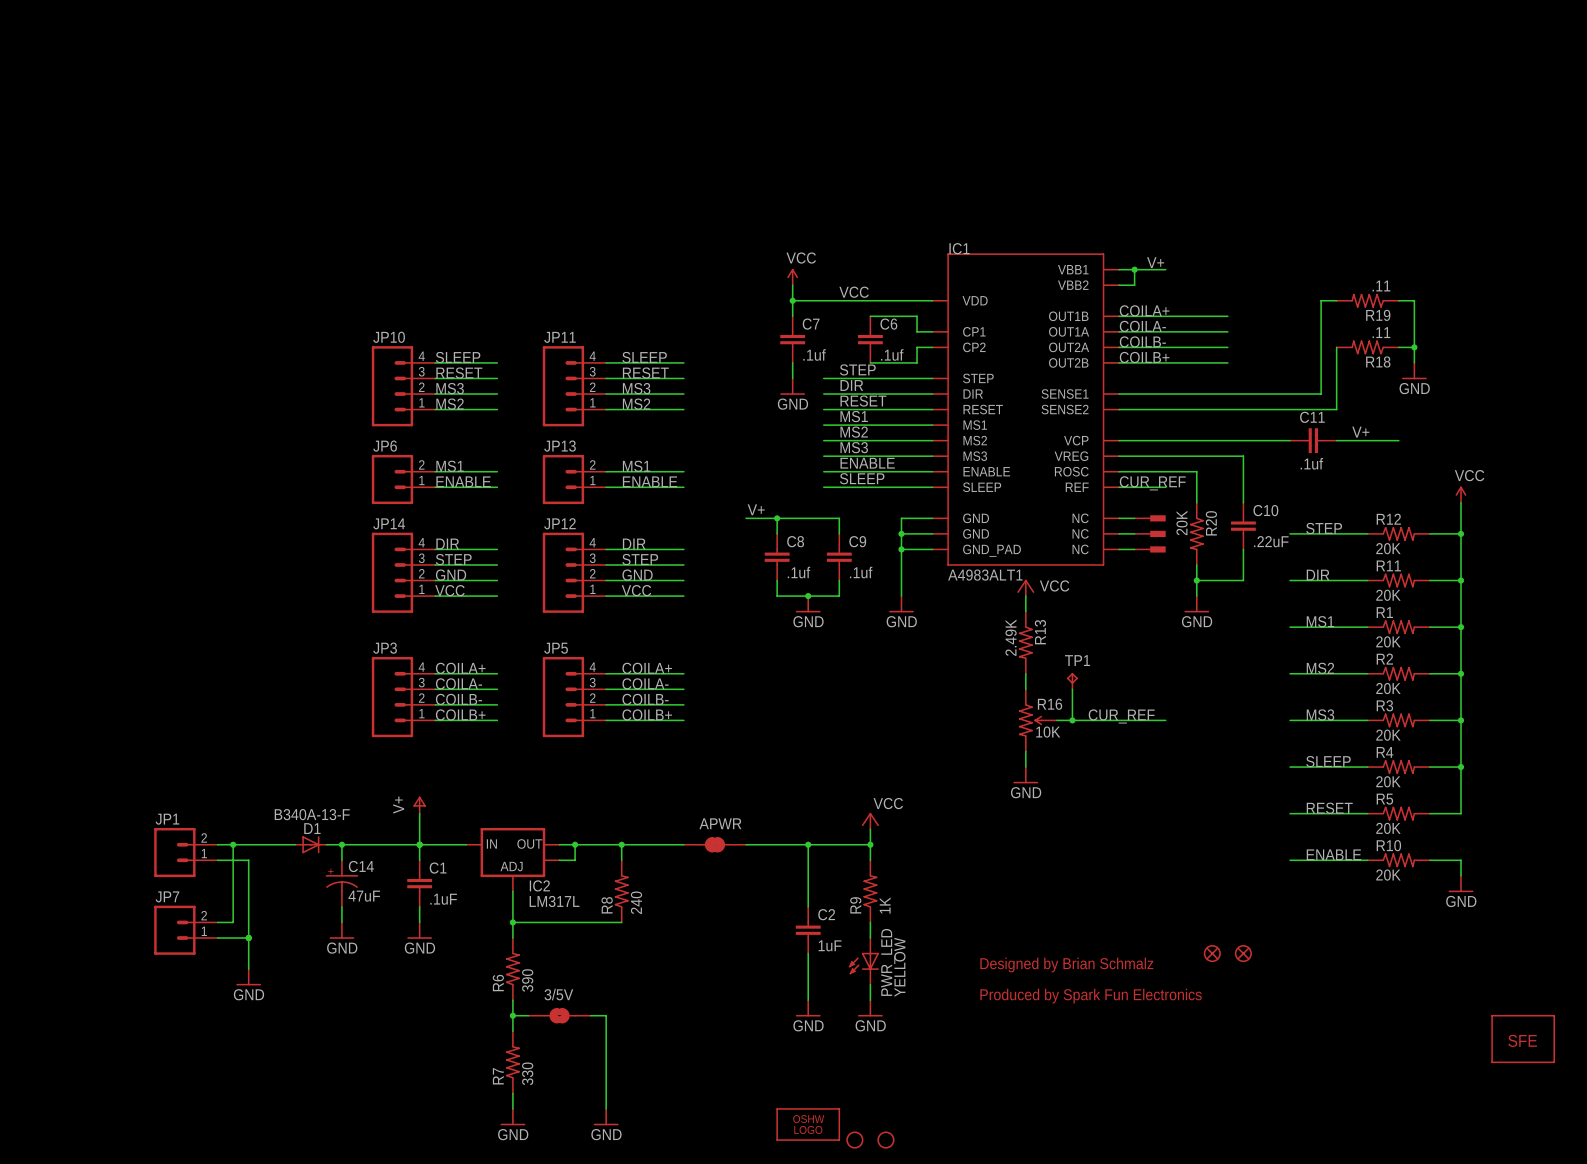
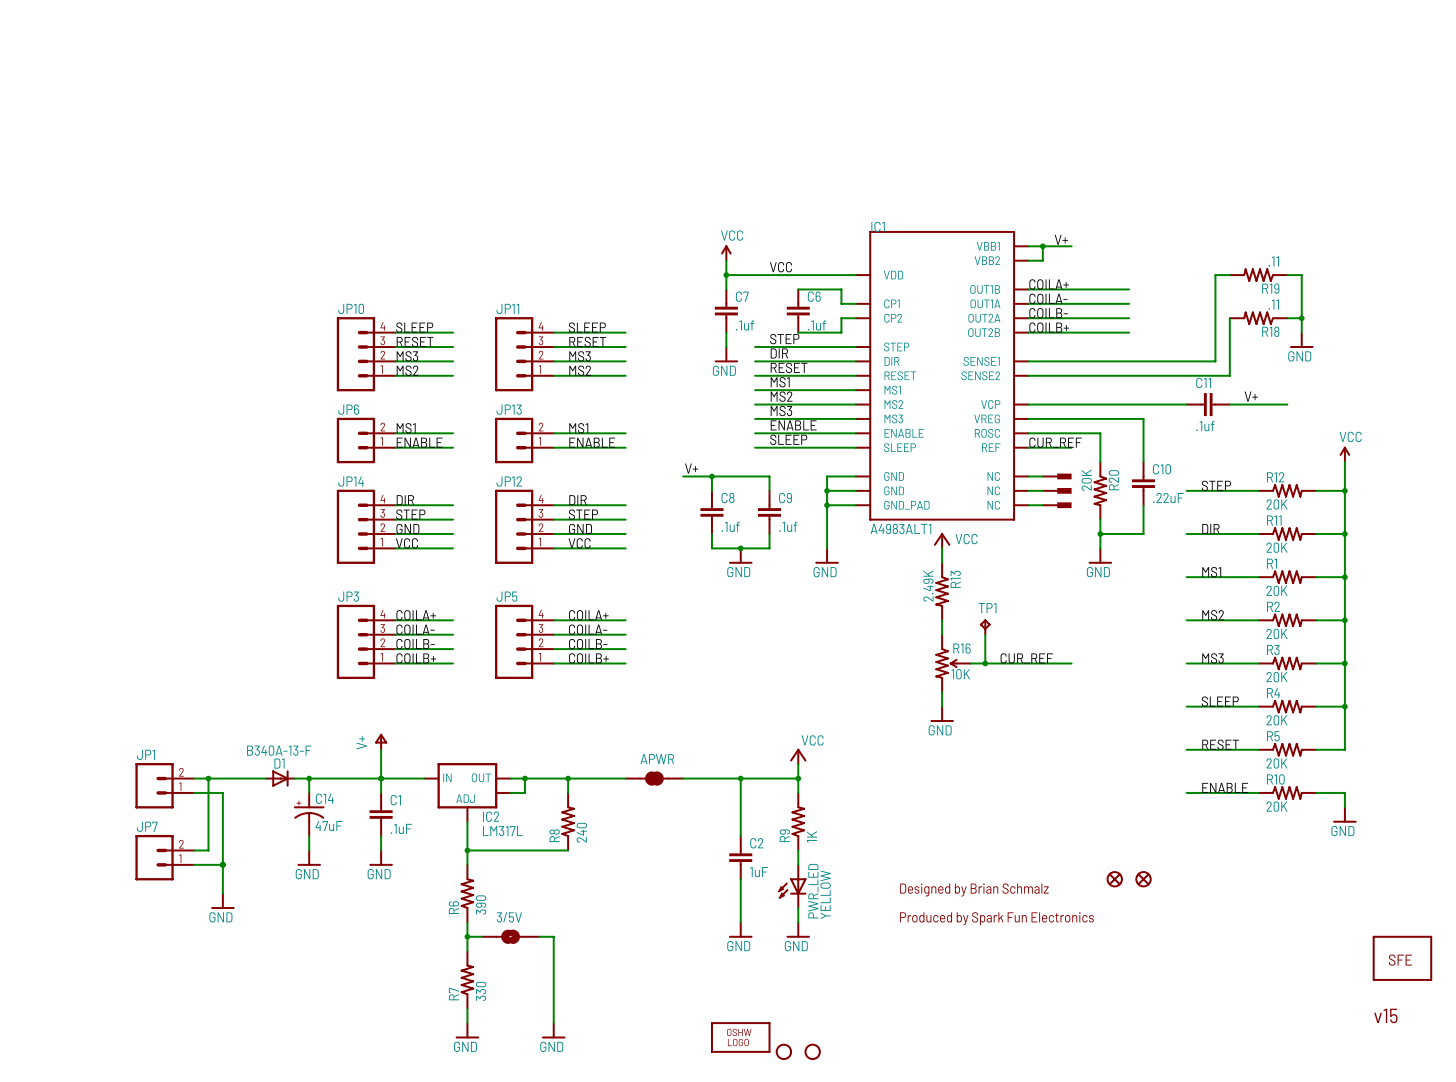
text: none -> v15 (1385, 1015)

